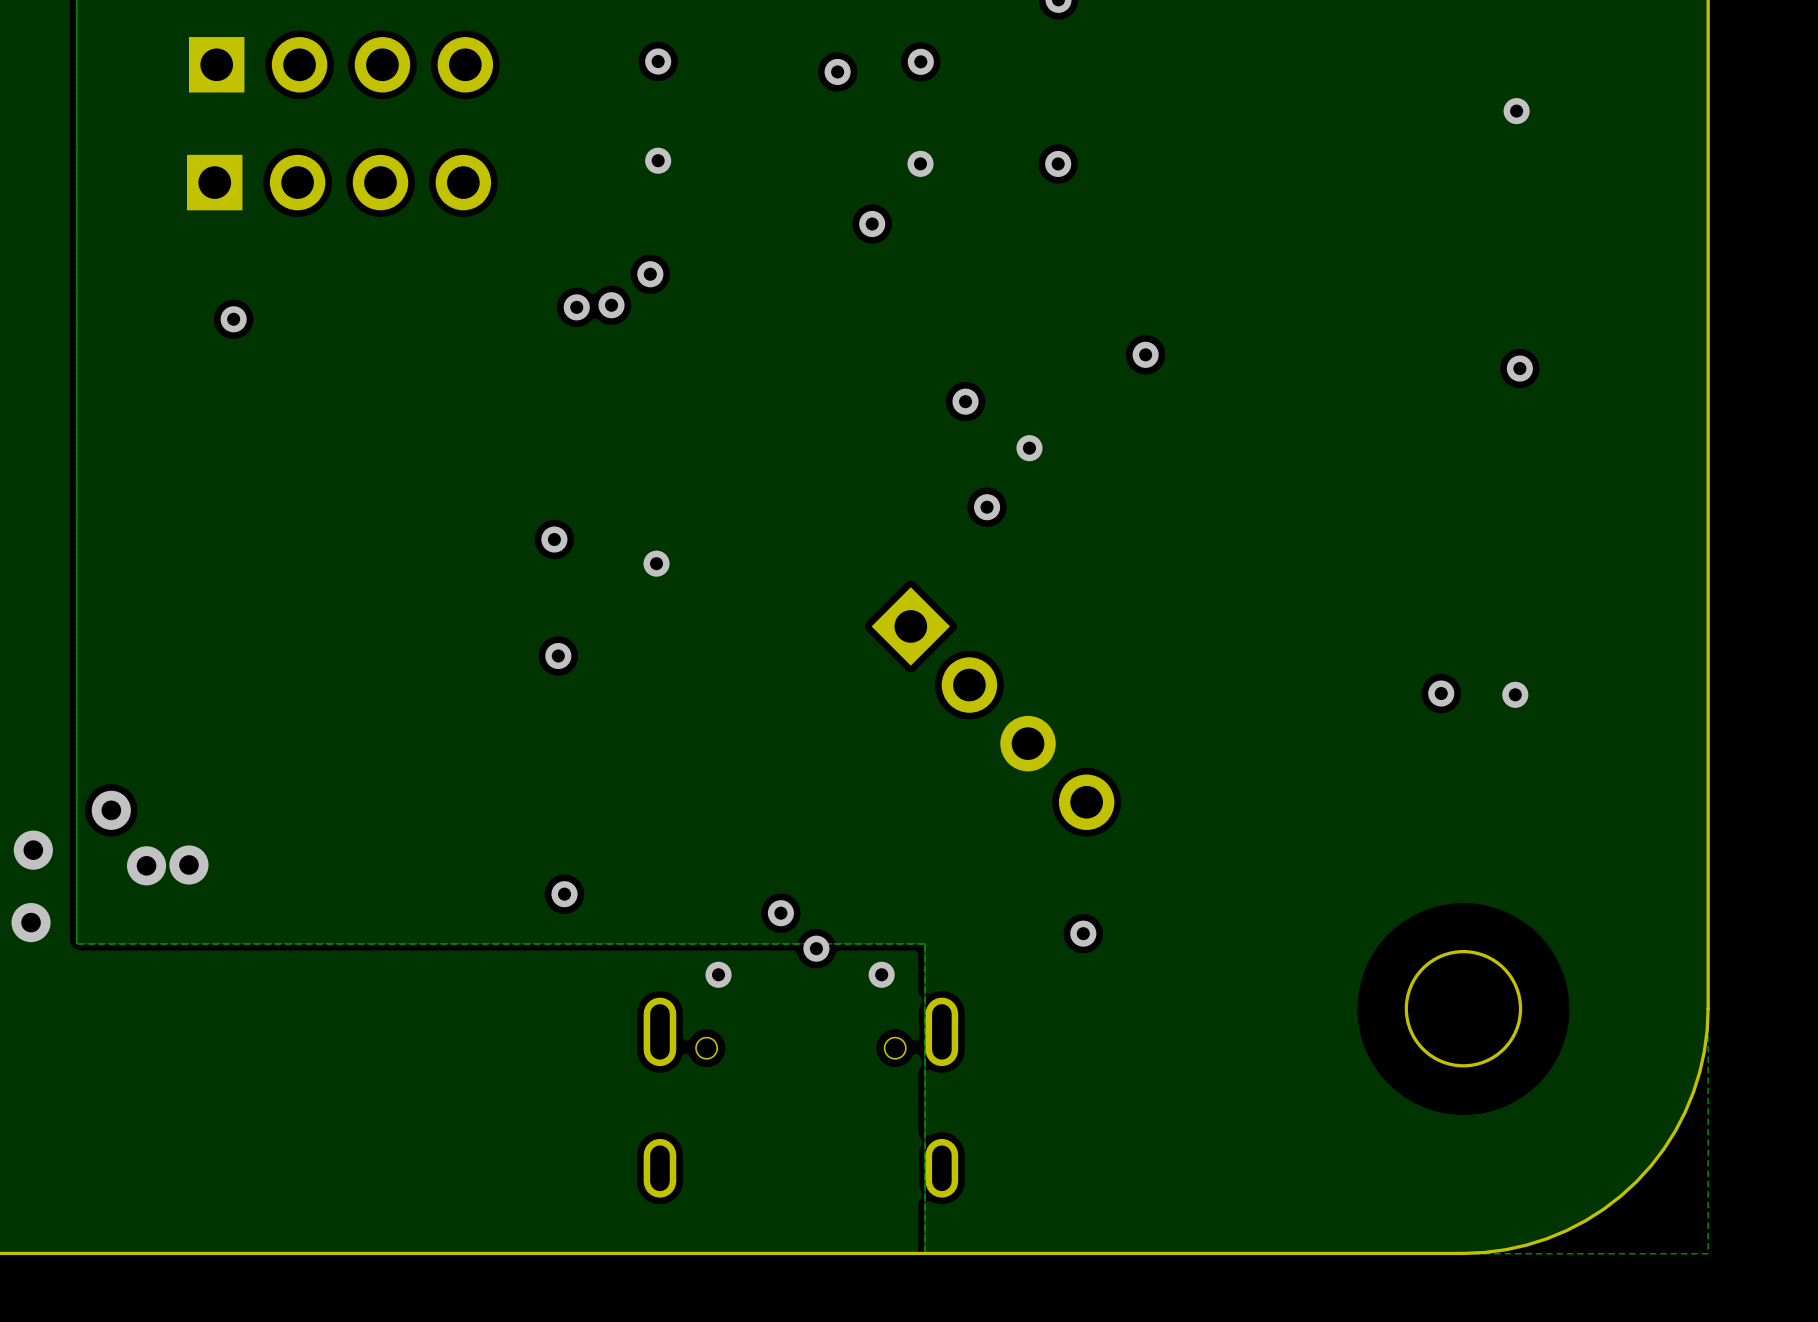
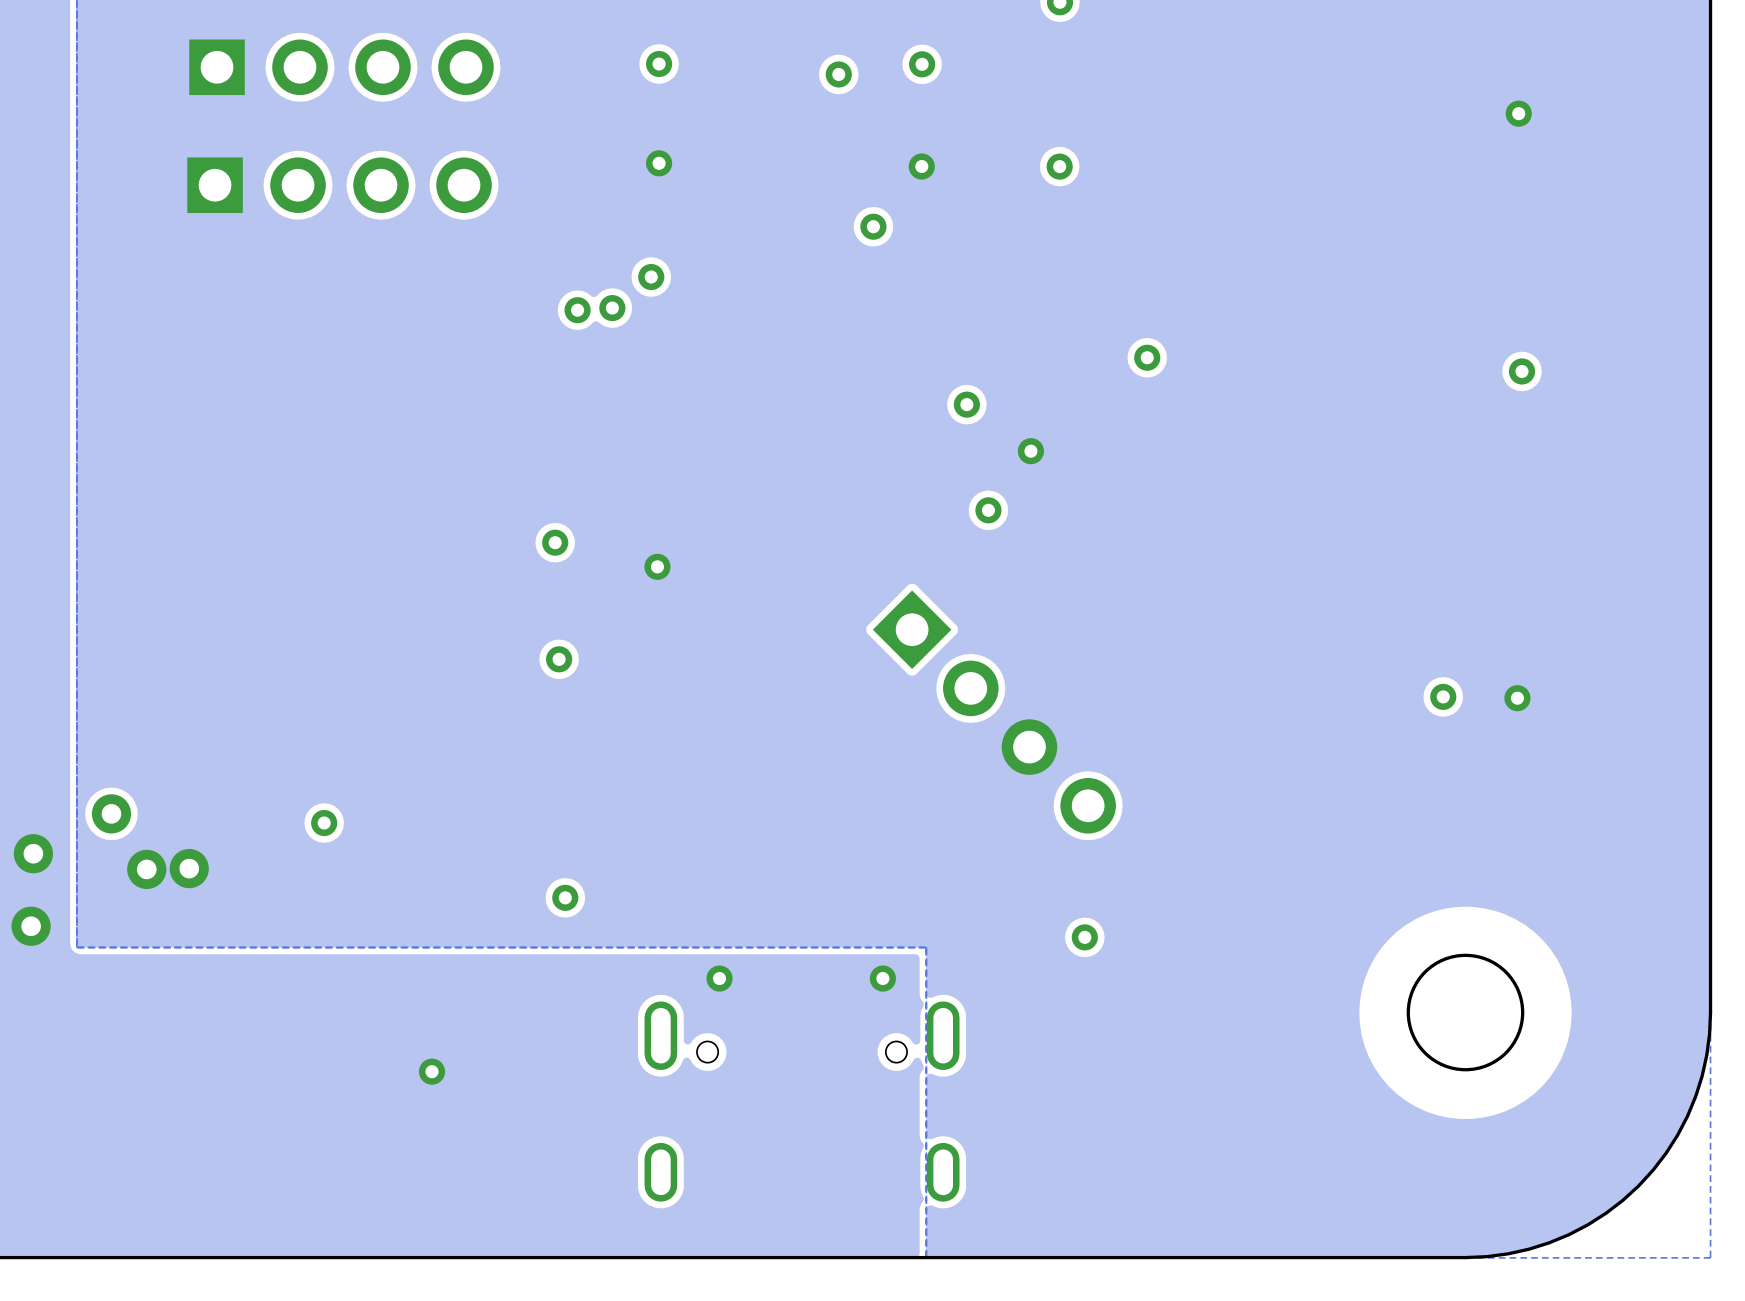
via: (233, 319) -> none
via: none -> (324, 823)
via: (780, 913) -> none
via: (816, 948) -> none
via: none -> (432, 1071)

